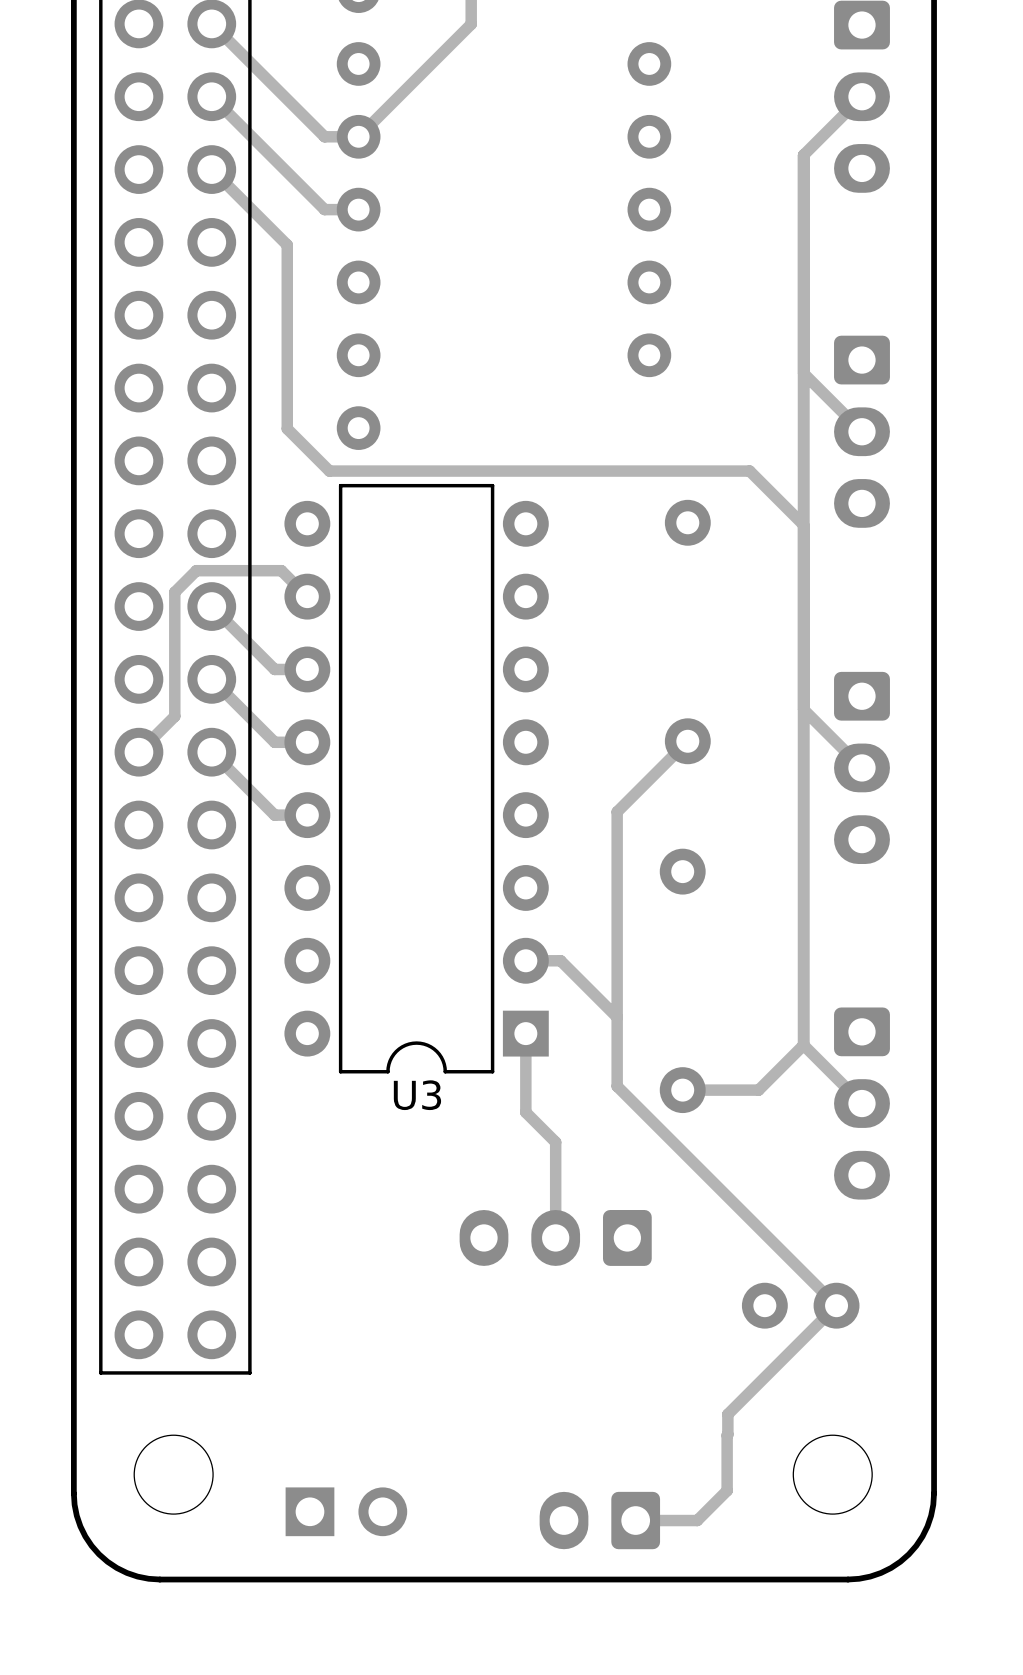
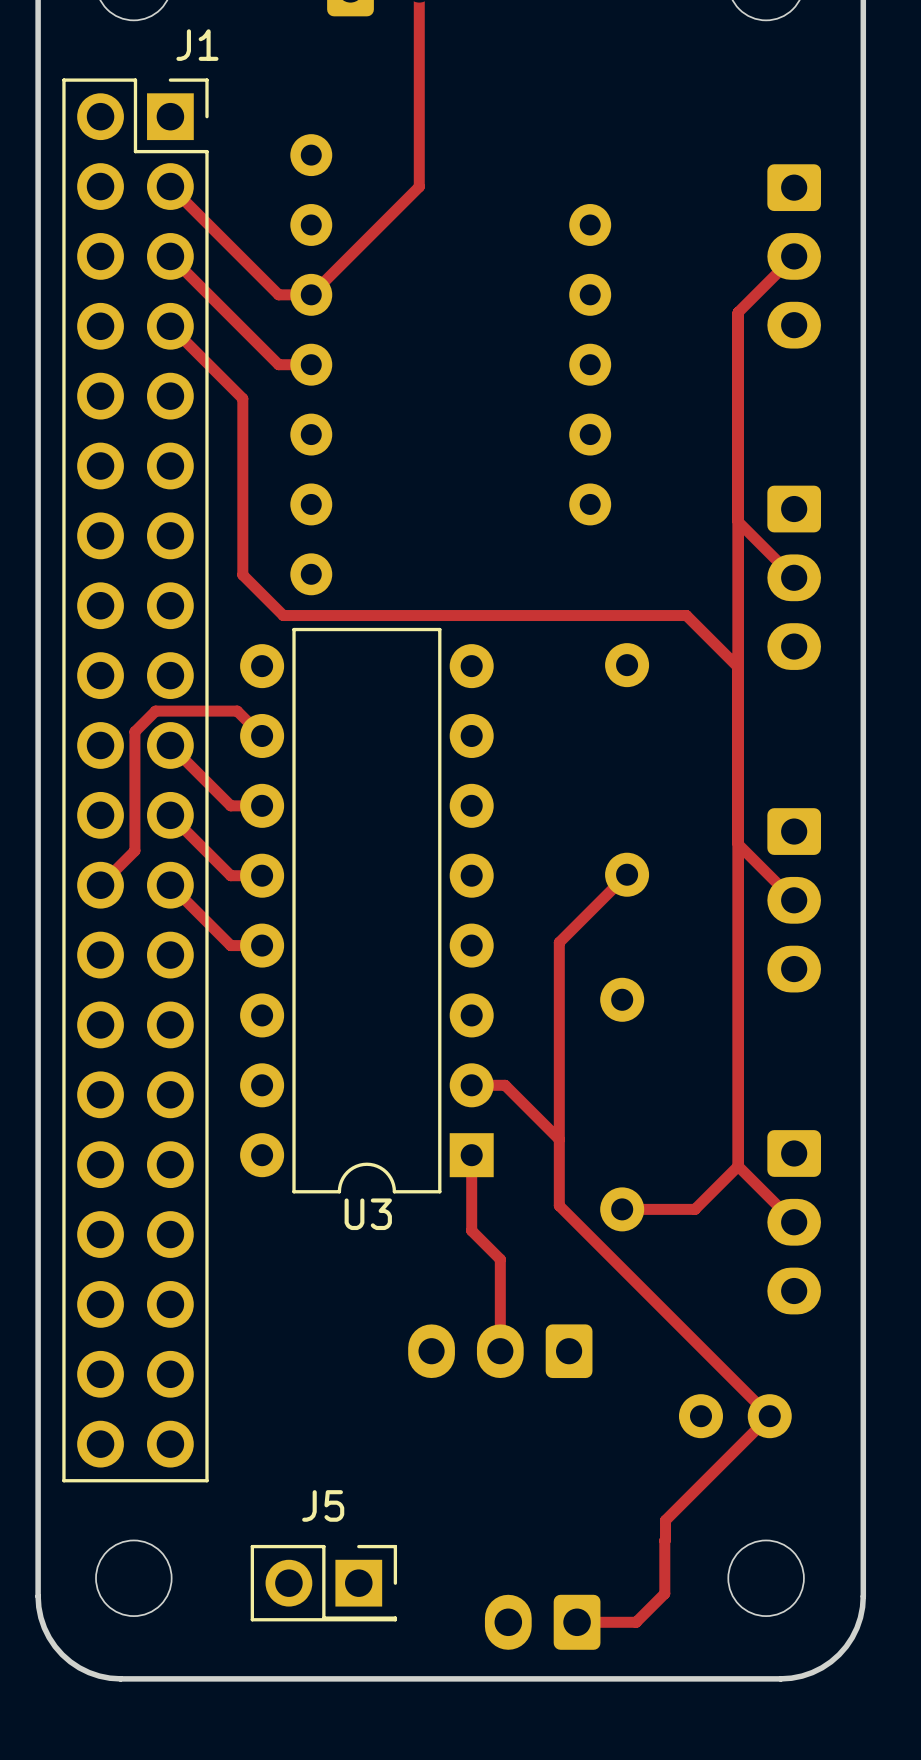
J5 side: bottom (346, 1511) -> top (323, 1583)

